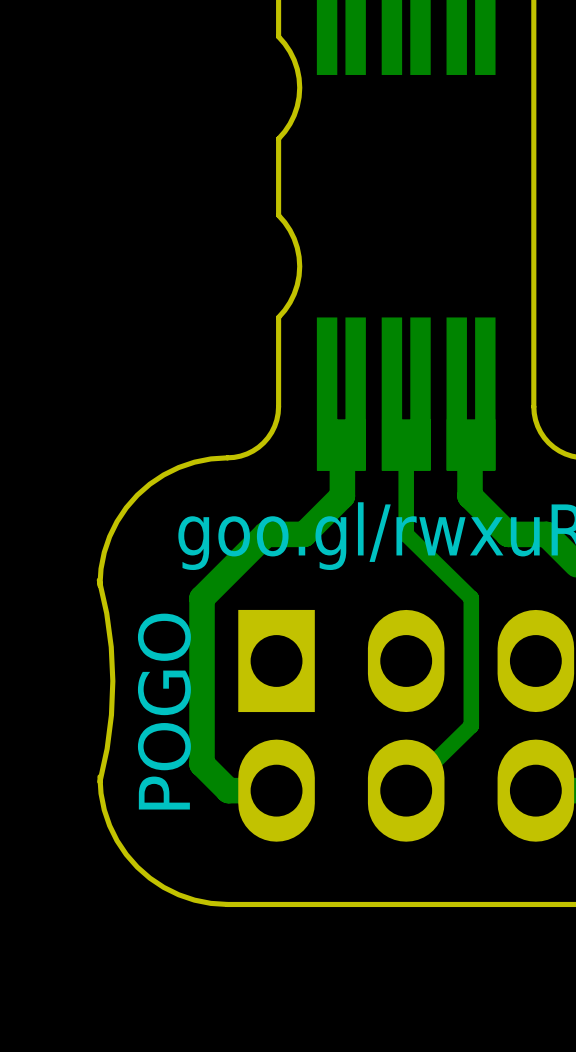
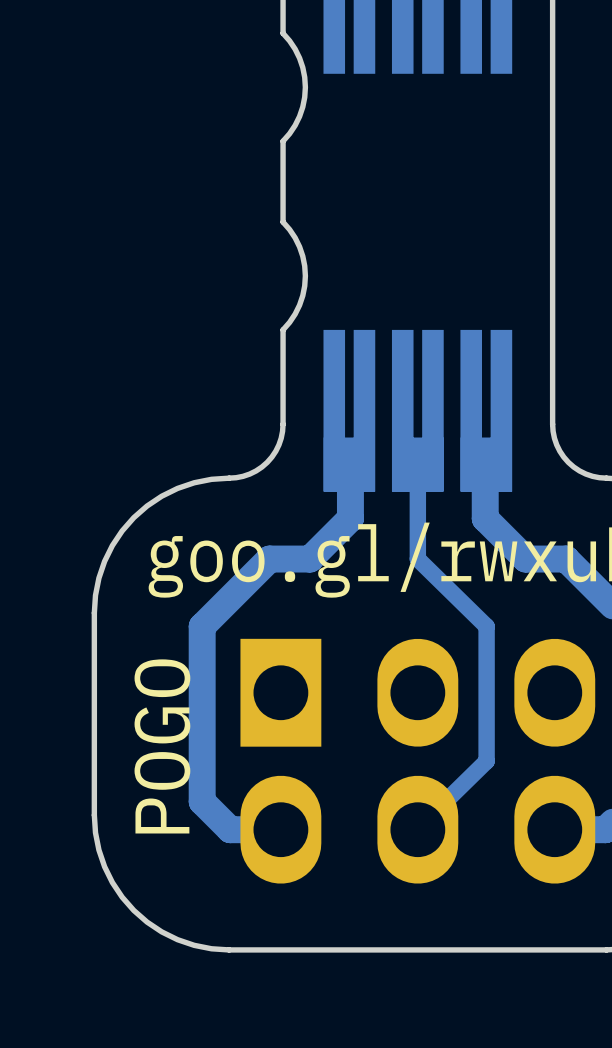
board edge: (99, 580) (111, 647) (112, 681) (107, 748) (99, 781) -> none
board edge: none -> (94, 612) (94, 815)

